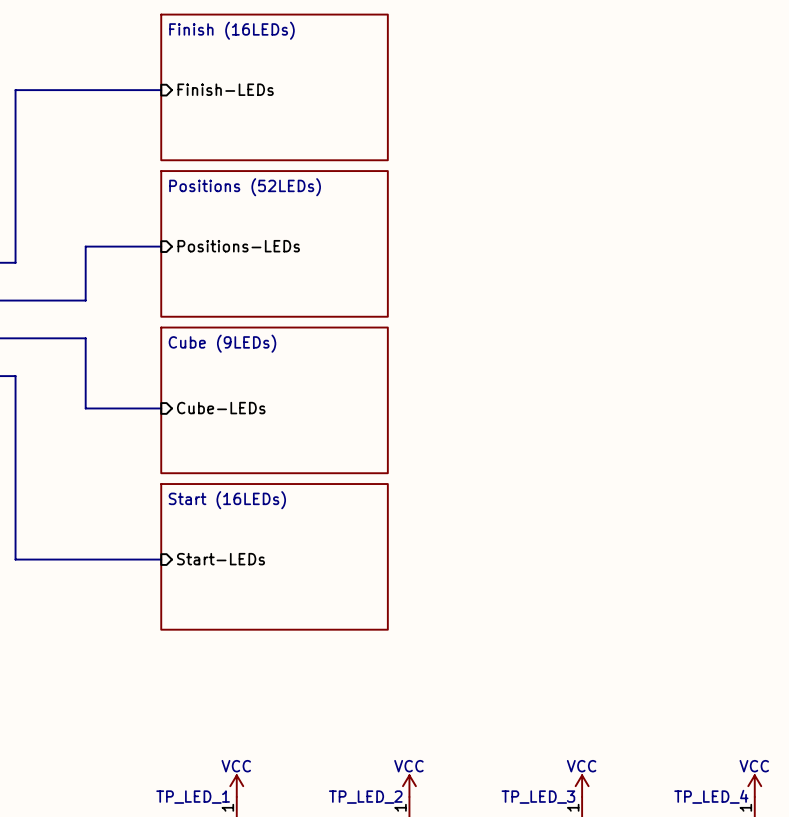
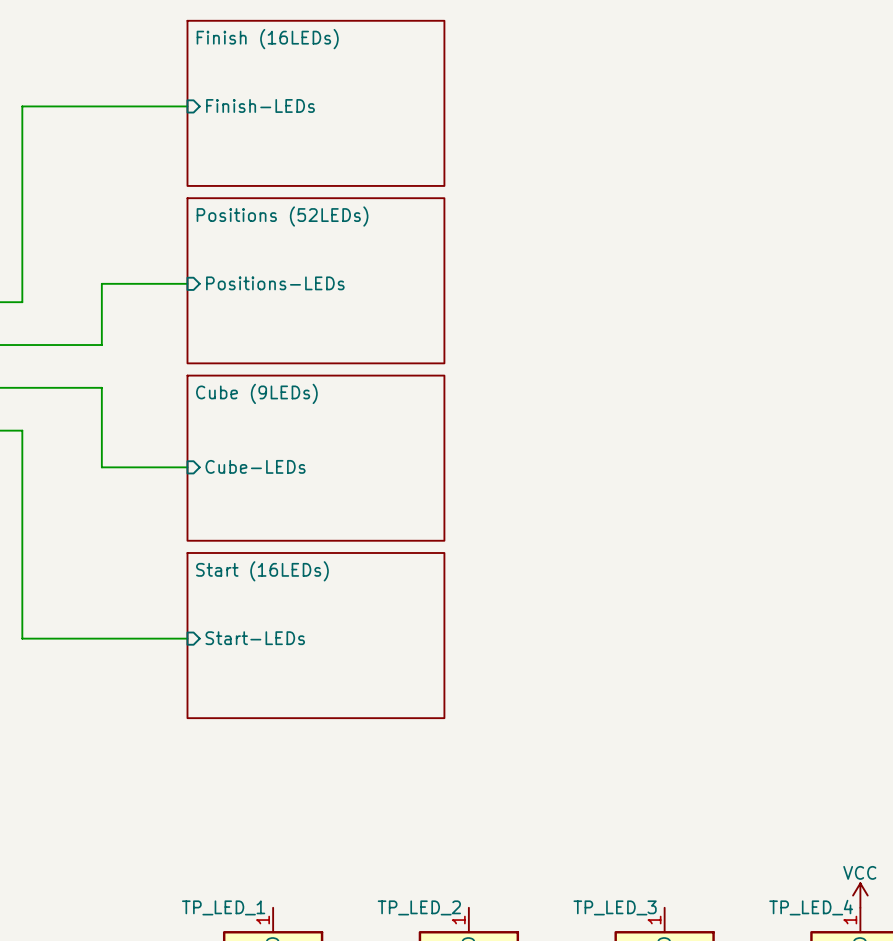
power symbol: VCC (236, 786) -> none
power symbol: VCC (409, 786) -> none
power symbol: VCC (582, 786) -> none

